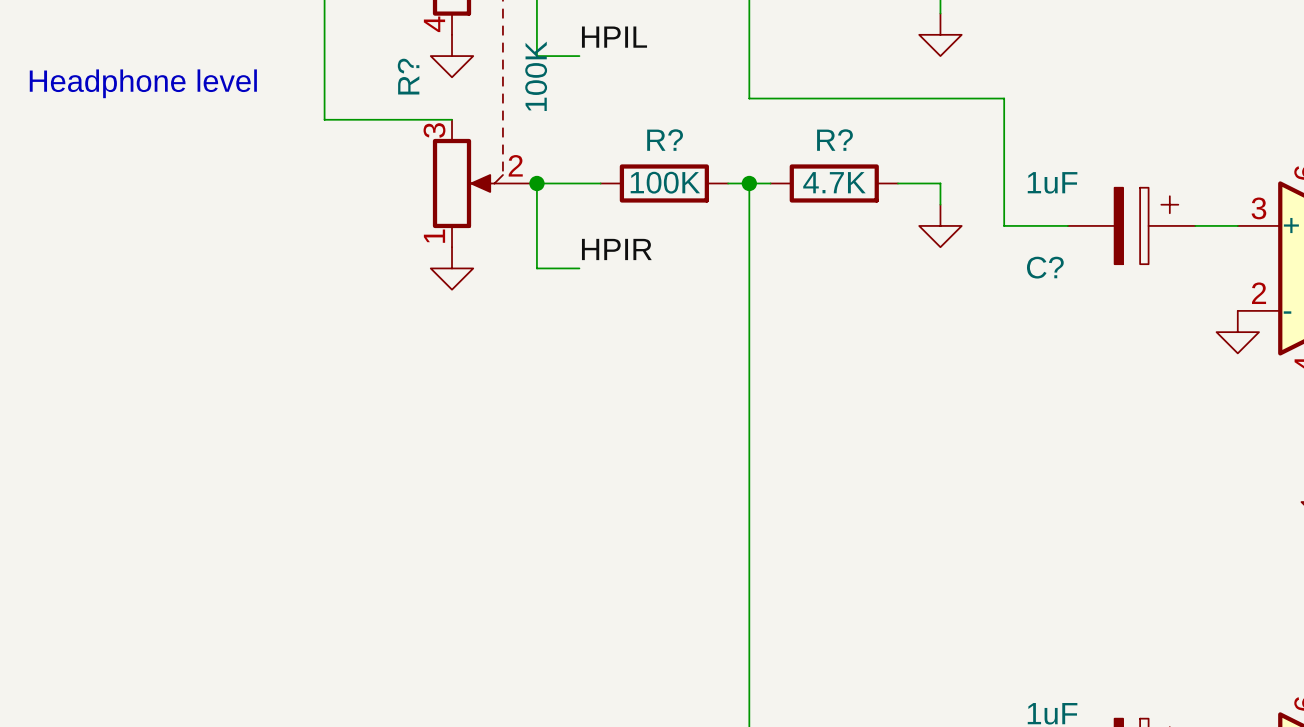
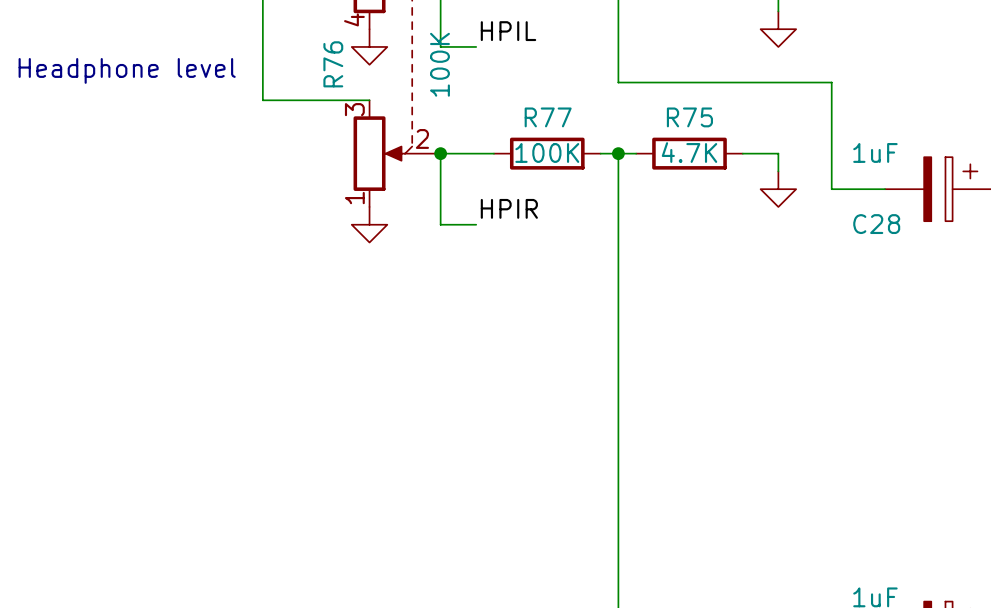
R? name: R? (408, 76) -> R76 (333, 64)
R? name: R? (665, 140) -> R77 (548, 117)
R? name: R? (834, 140) -> R75 (689, 117)
C? name: C? (1045, 267) -> C28 (876, 224)

